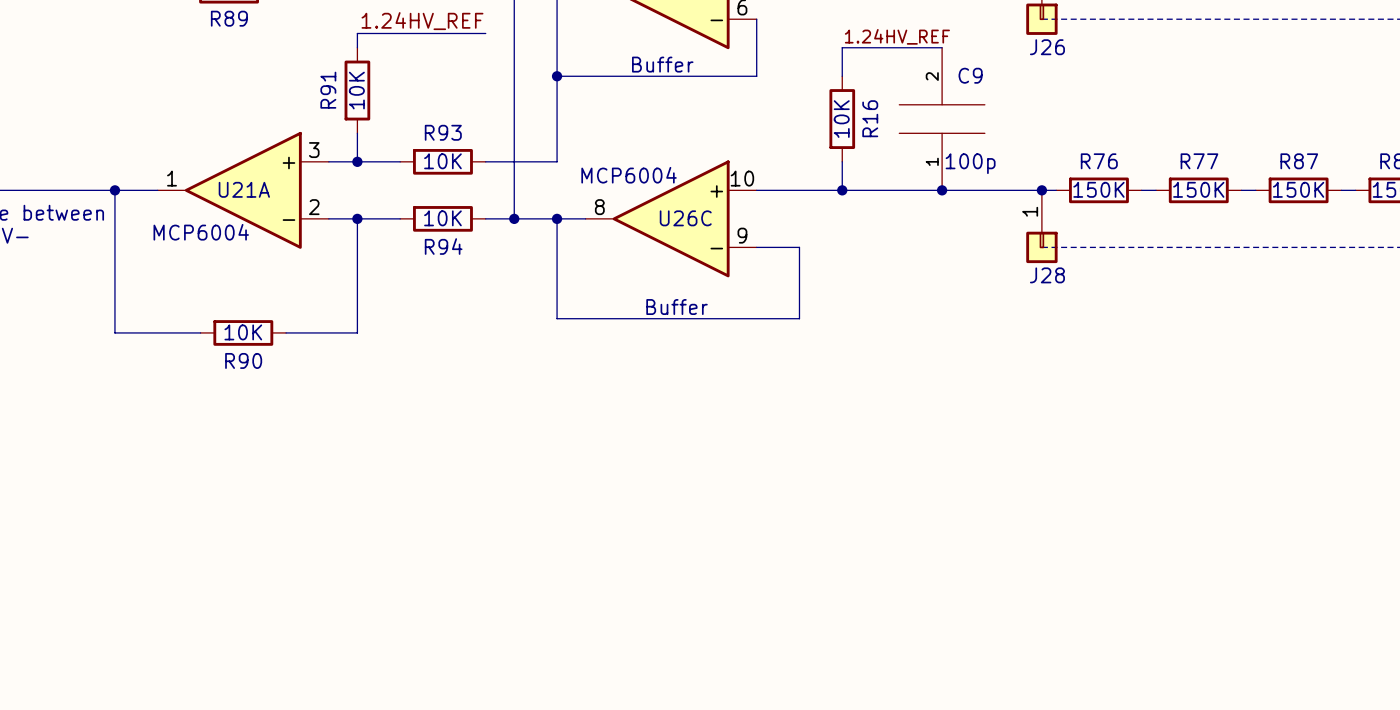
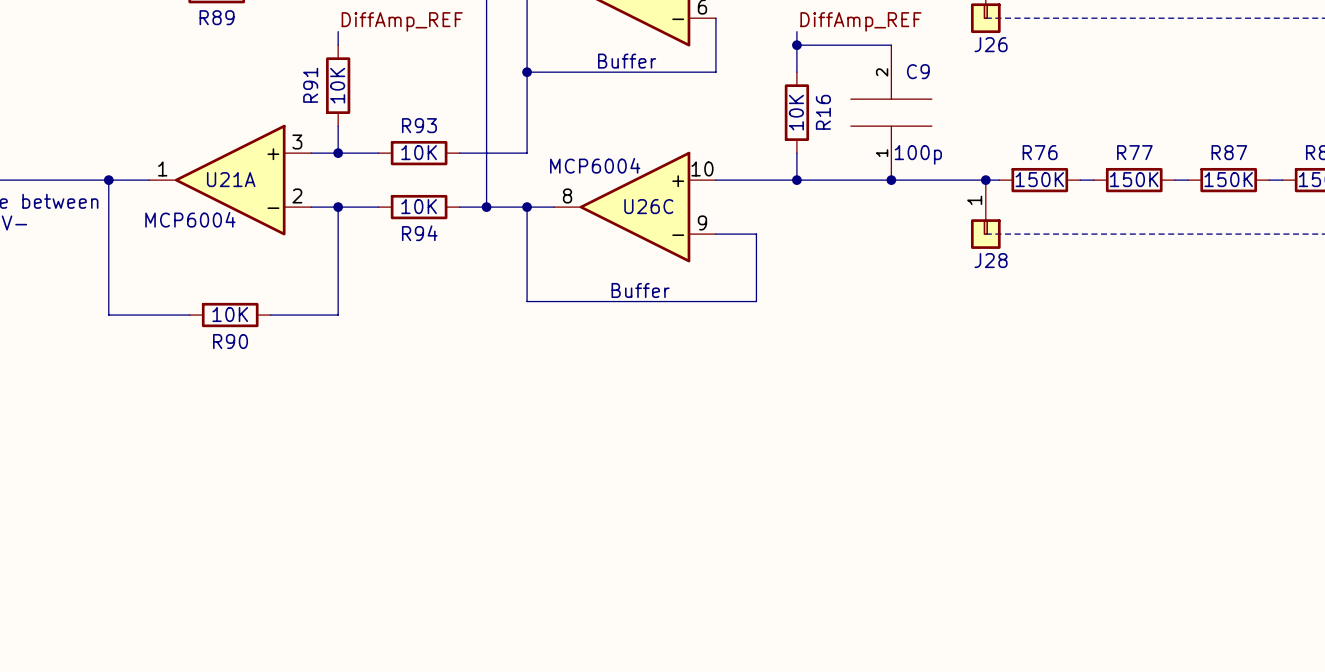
label: 1.24HV_REF (422, 21) -> none
label: none -> DiffAmp_REF (402, 21)
label: none -> DiffAmp_REF (860, 21)
wire: (357, 33) (485, 33) -> none
wire: none -> (796, 31) (796, 45)
label: 1.24HV_REF (897, 36) -> none
junction: none -> (796, 45)

